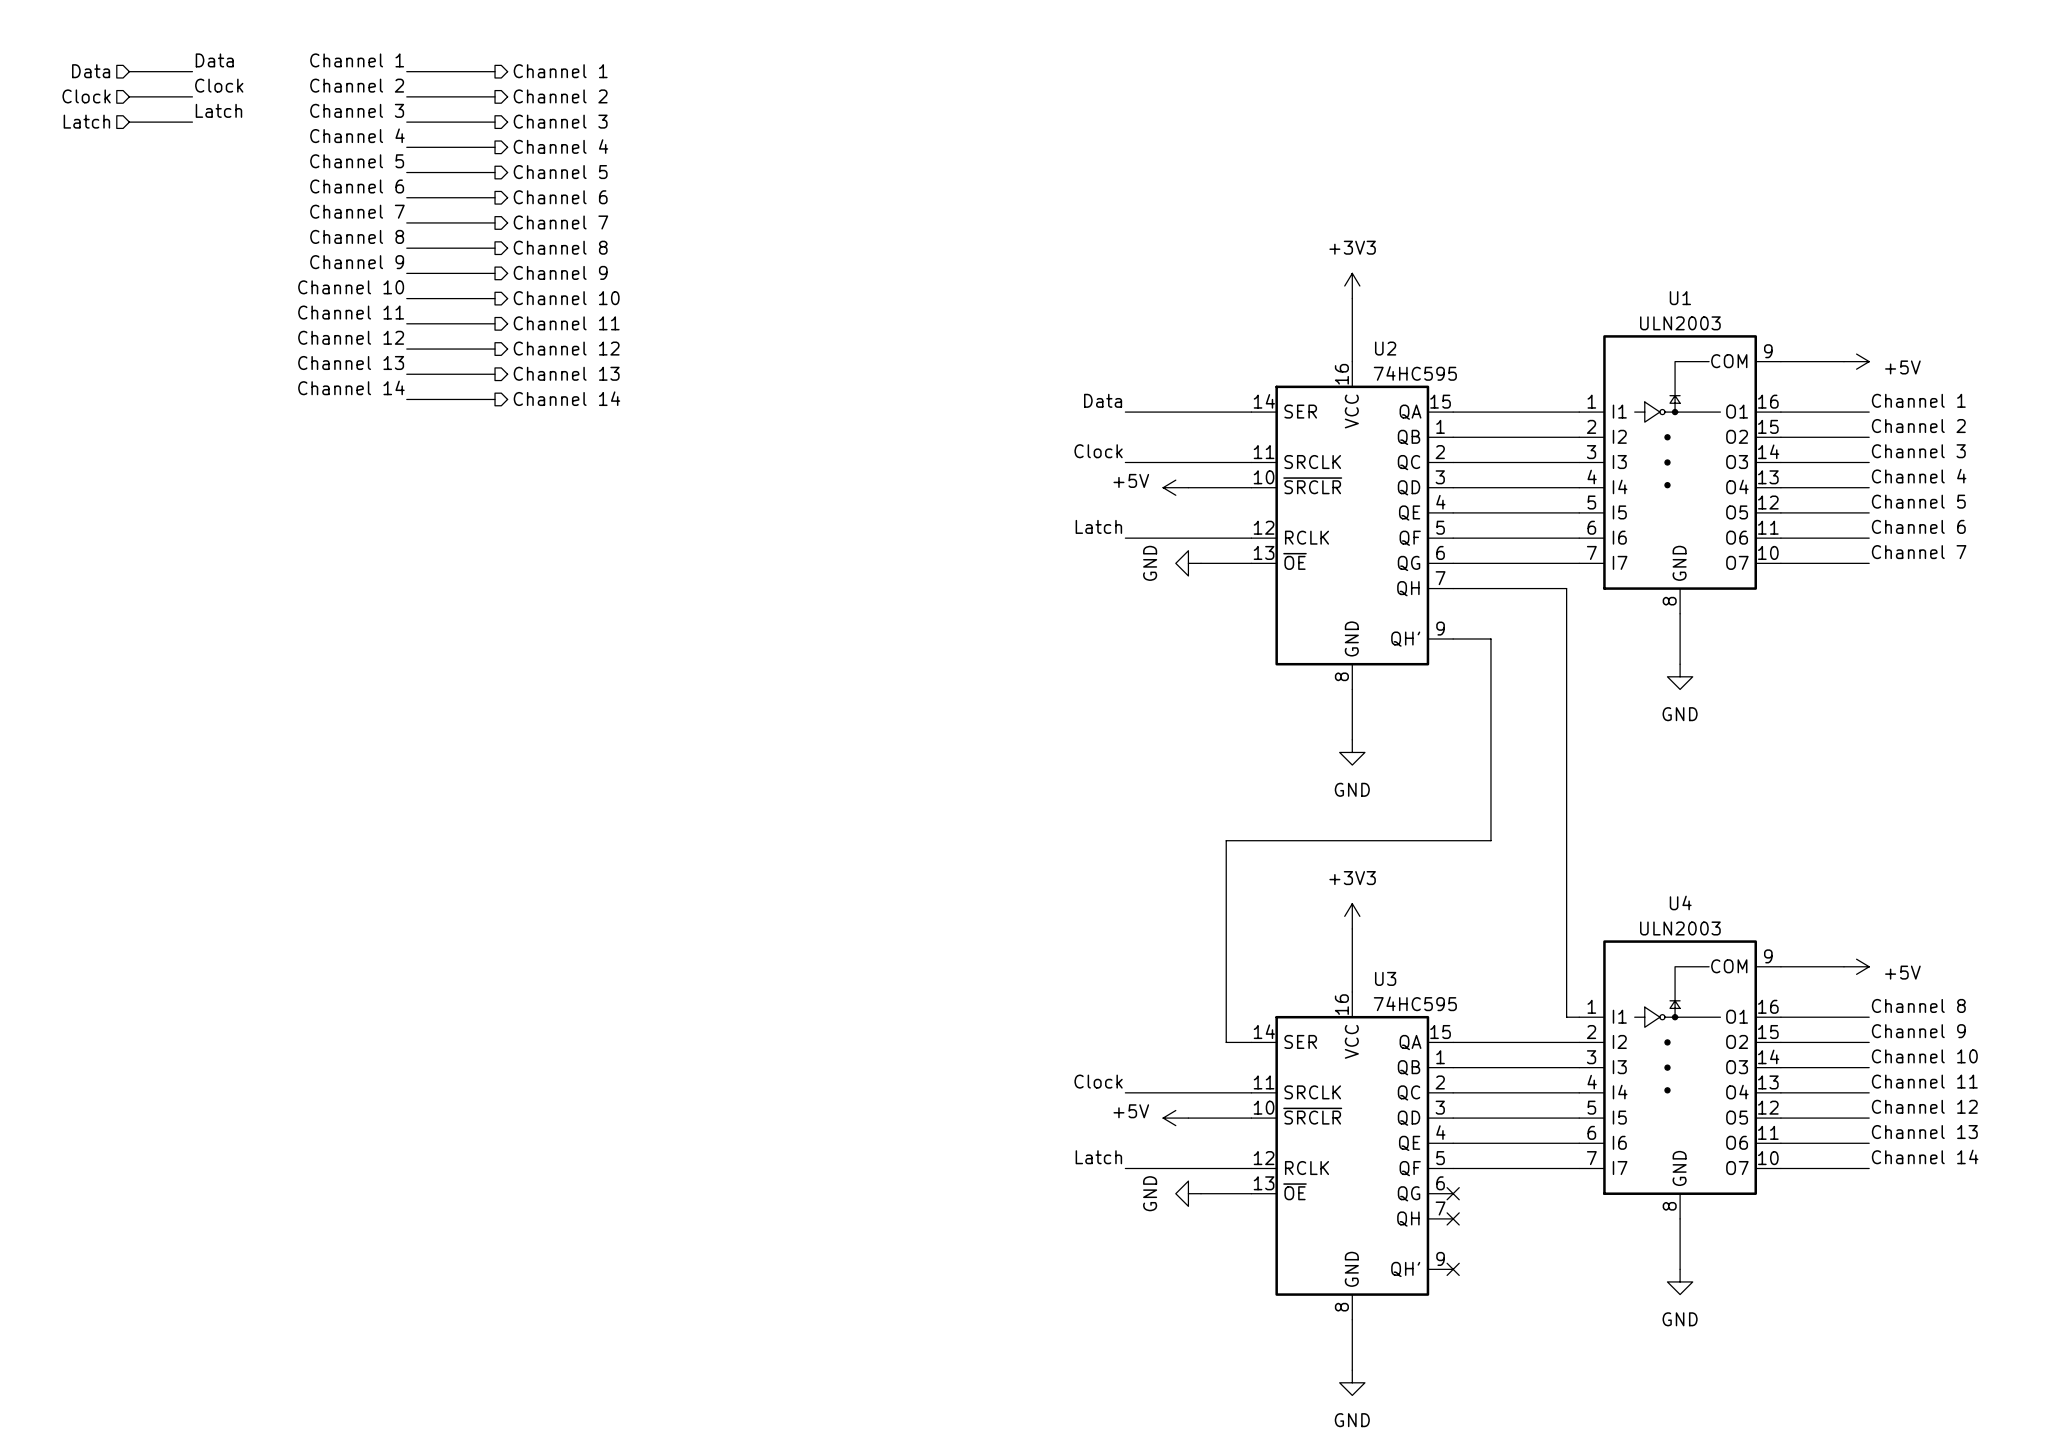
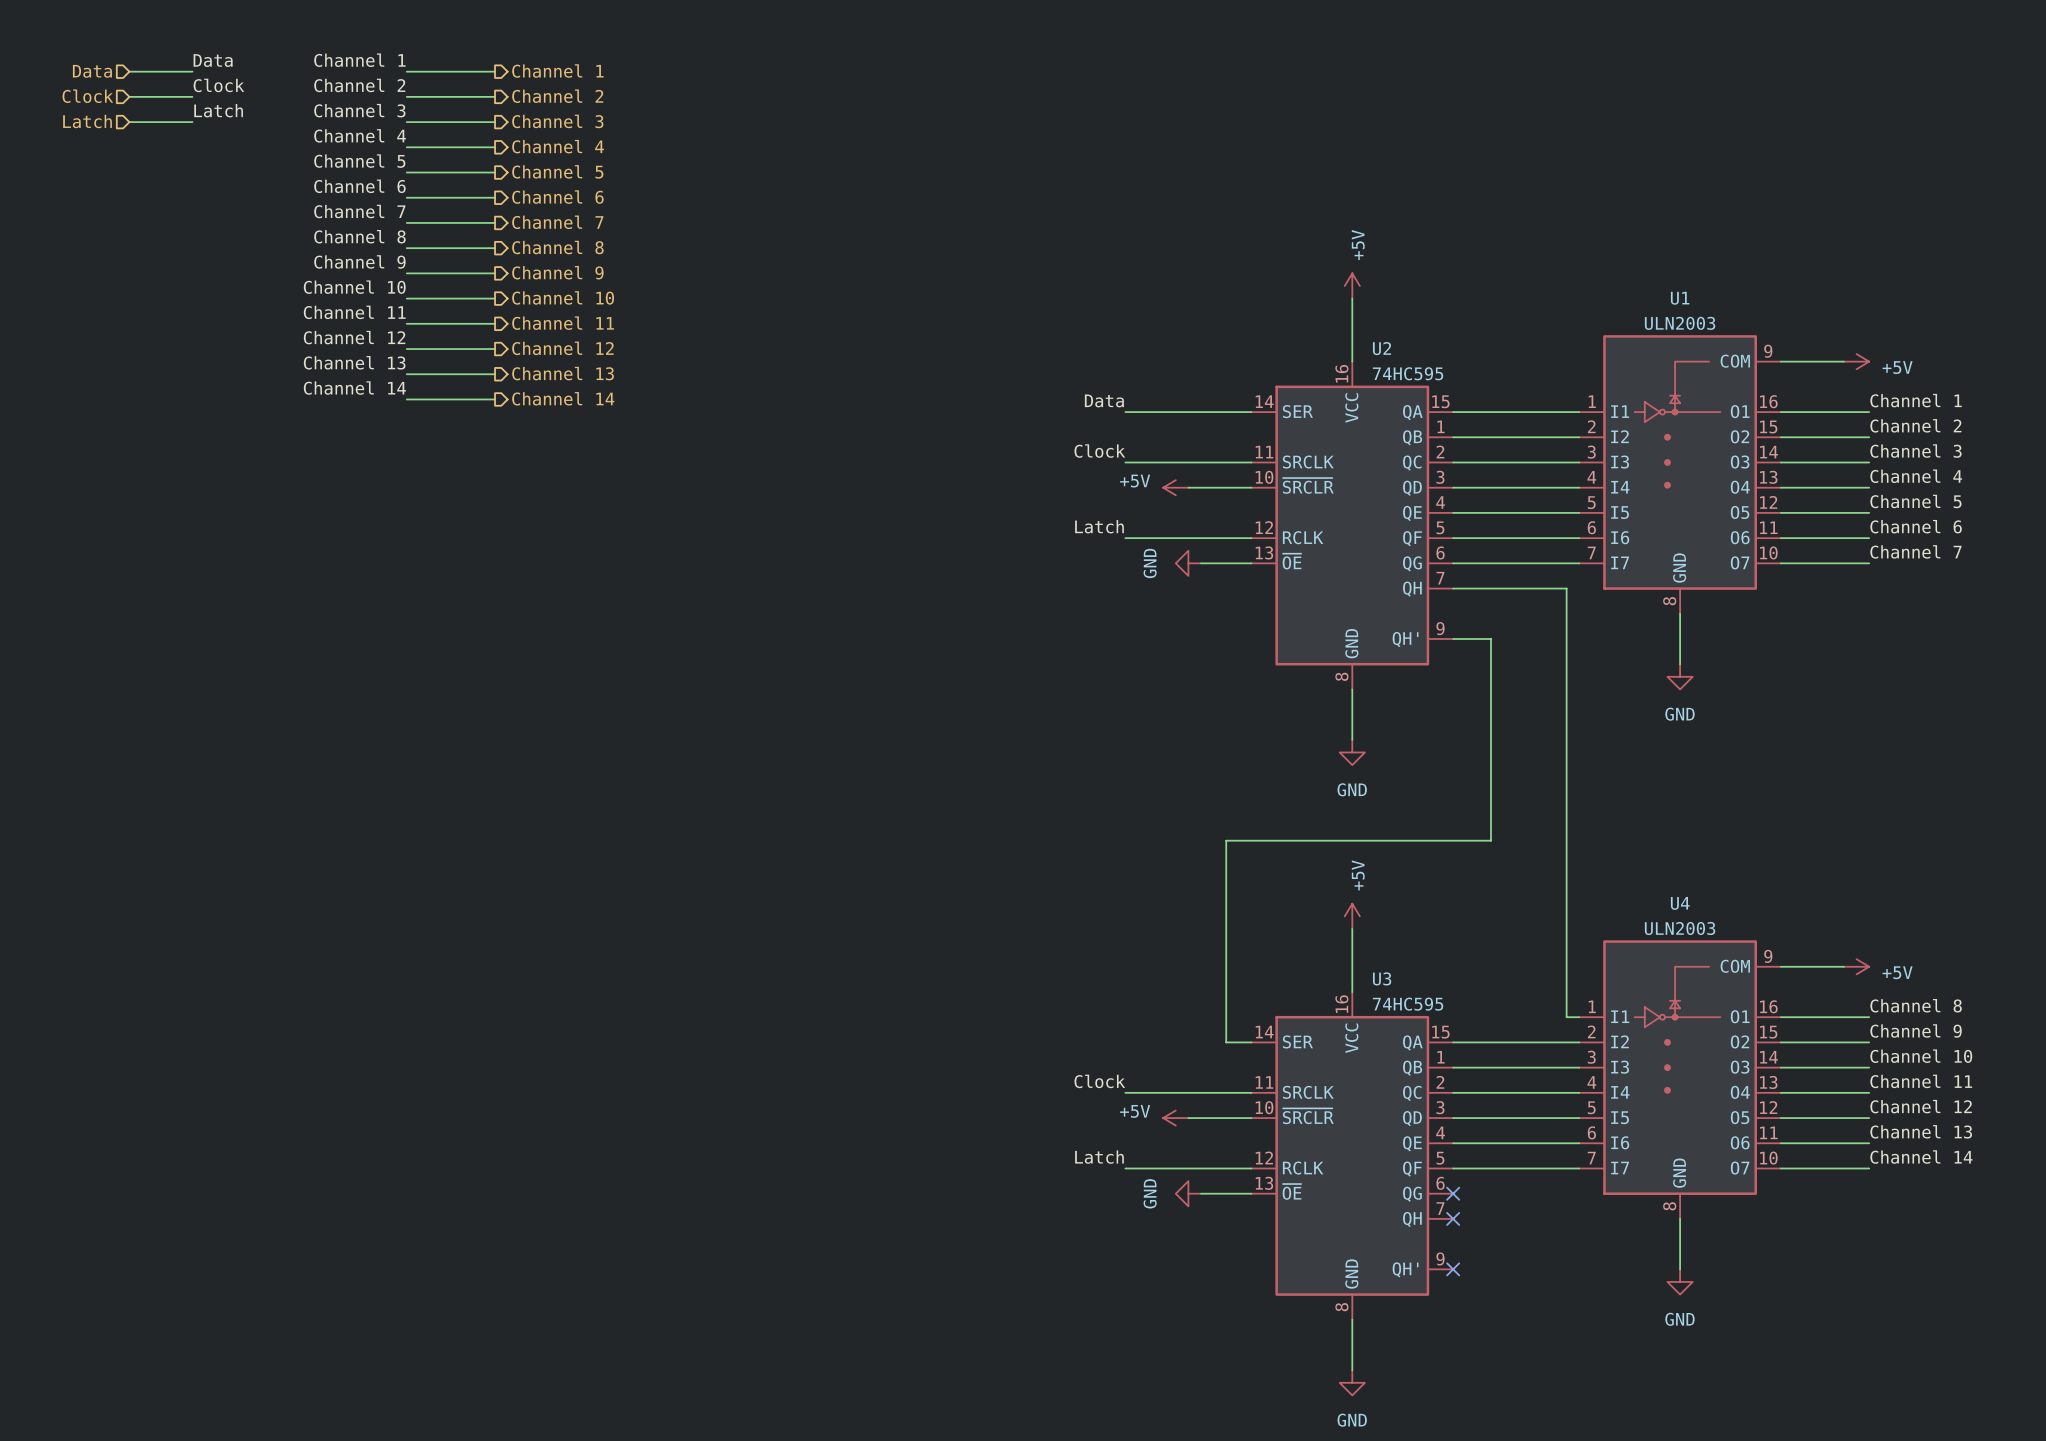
power symbol: +3V3 (1352, 285) -> +5V (1352, 285)
power symbol: +3V3 (1352, 916) -> +5V (1352, 916)

